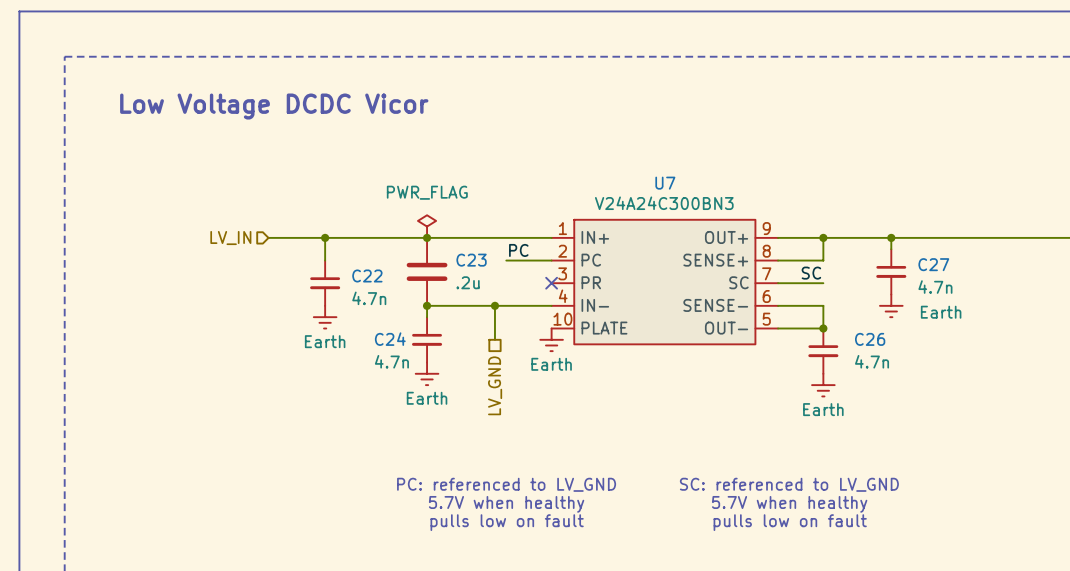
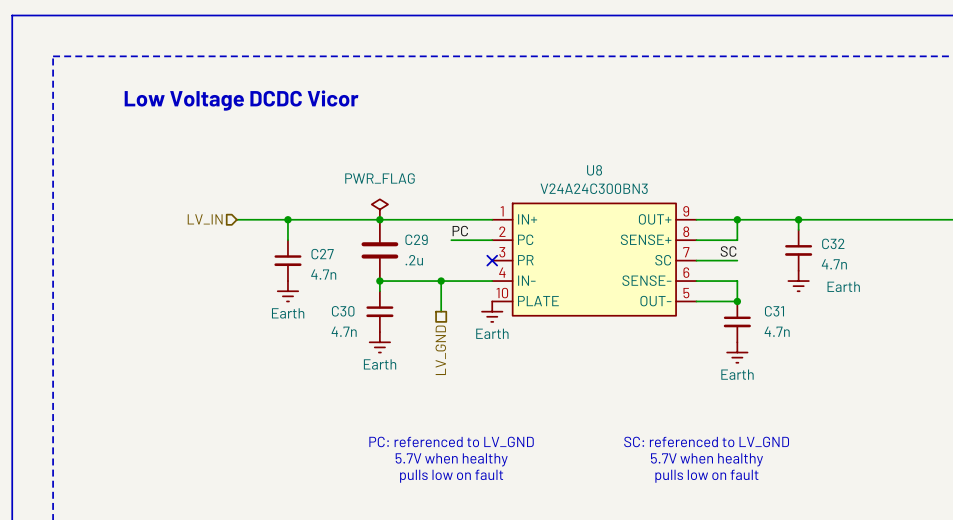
U7 name: U7 (665, 183) -> U8 (594, 170)
C23 name: C23 (471, 260) -> C29 (416, 239)
C27 name: C27 (933, 264) -> C32 (833, 243)
C22 name: C22 (367, 275) -> C27 (322, 254)
C24 name: C24 (390, 339) -> C30 (343, 311)
C26 name: C26 (870, 339) -> C31 (774, 311)

